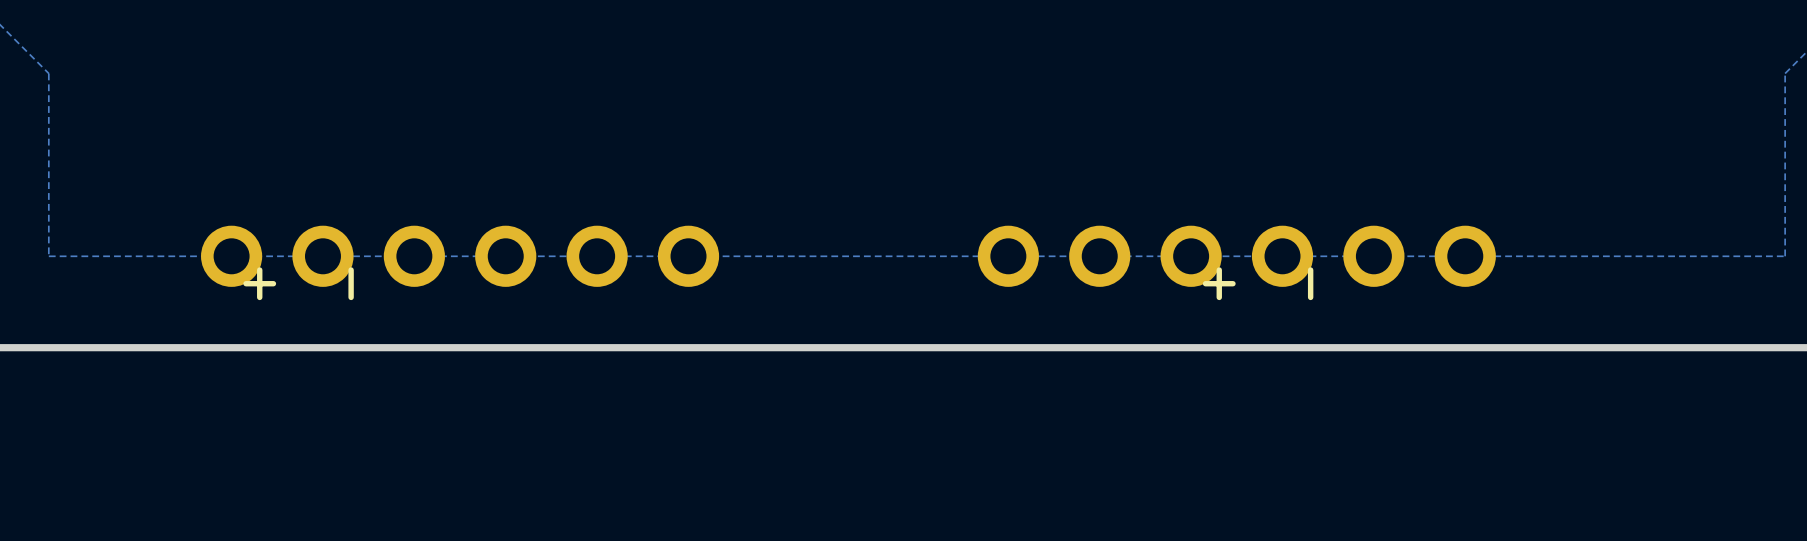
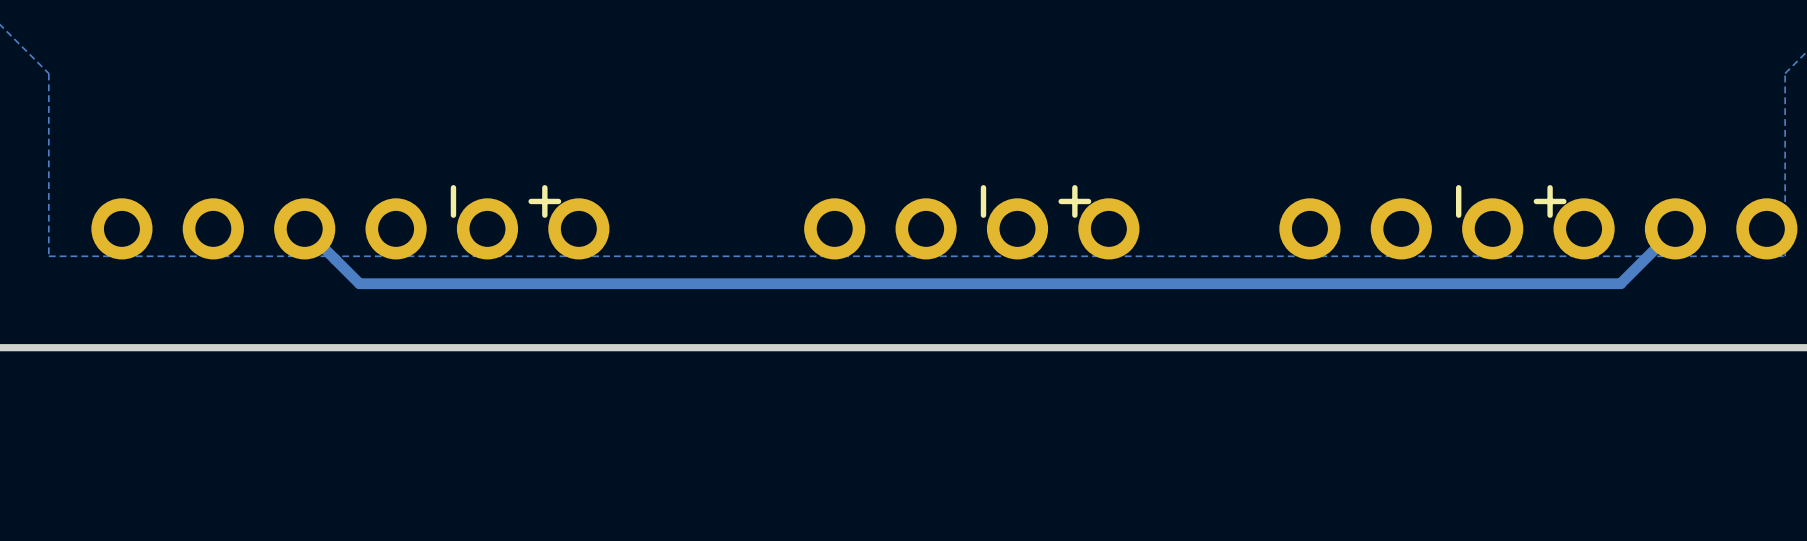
part: none -> (971, 228)
track: none -> (1675, 228) (1620, 283) (359, 283) (304, 228)
part rotation: 0° (460, 256) -> 180° (350, 228)
part rotation: 0° (1236, 256) -> 180° (1538, 228)

